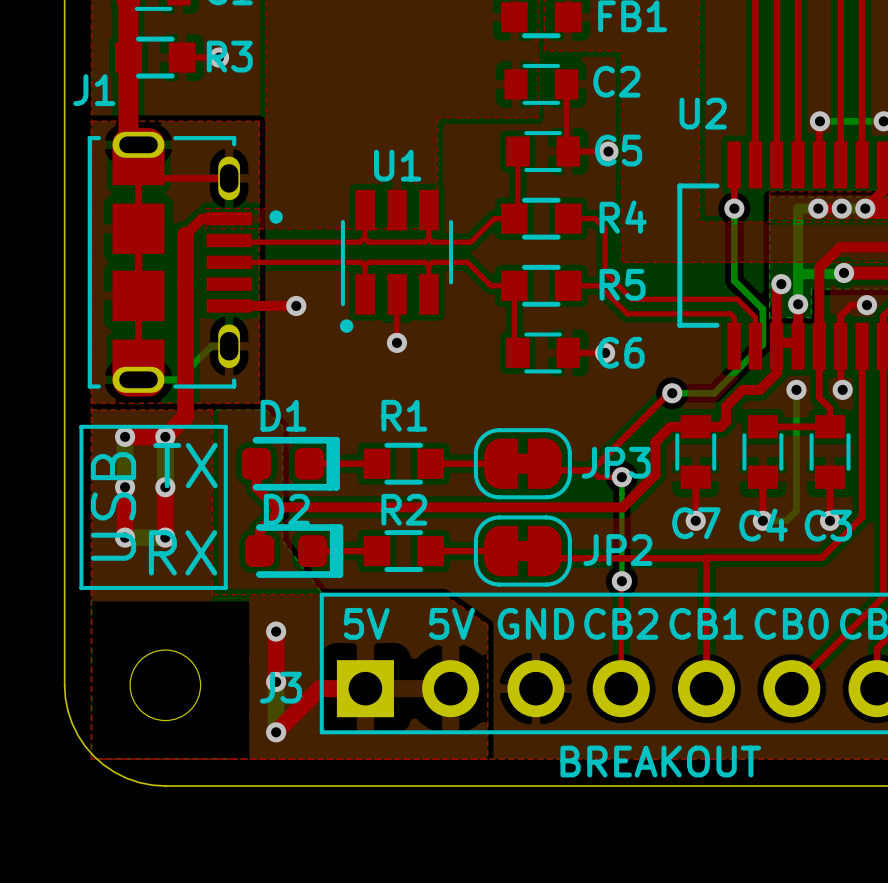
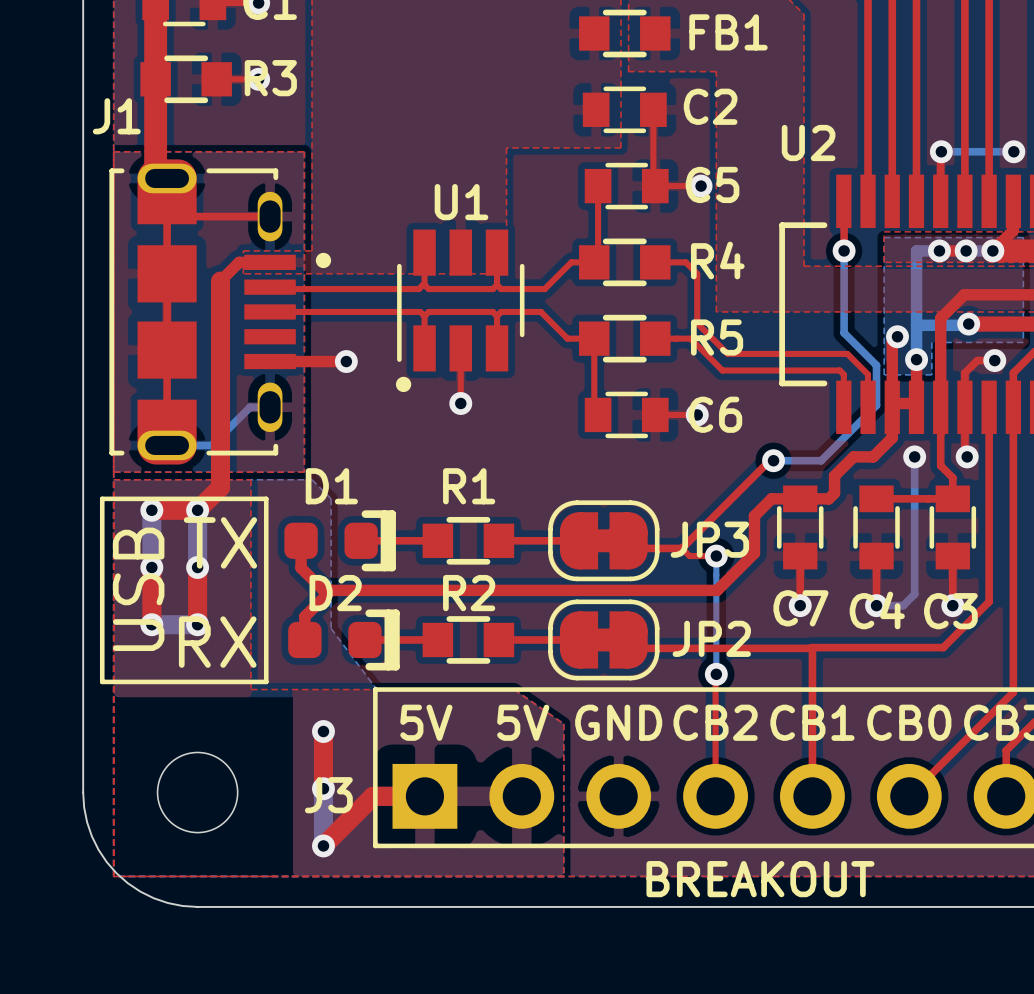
D1 footprint: [241, 436, 340, 491] -> [284, 510, 396, 572]
D2 footprint: [245, 524, 344, 578] -> [288, 609, 400, 671]

